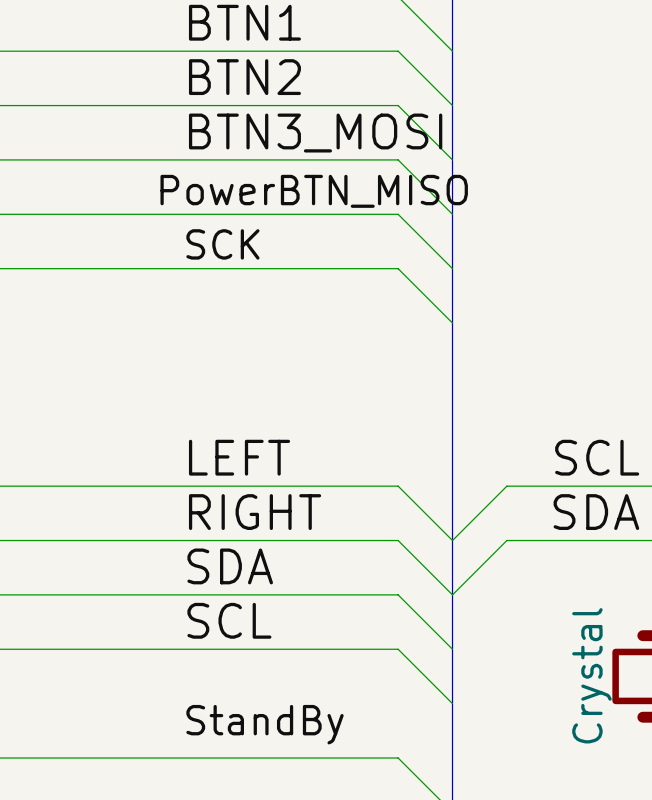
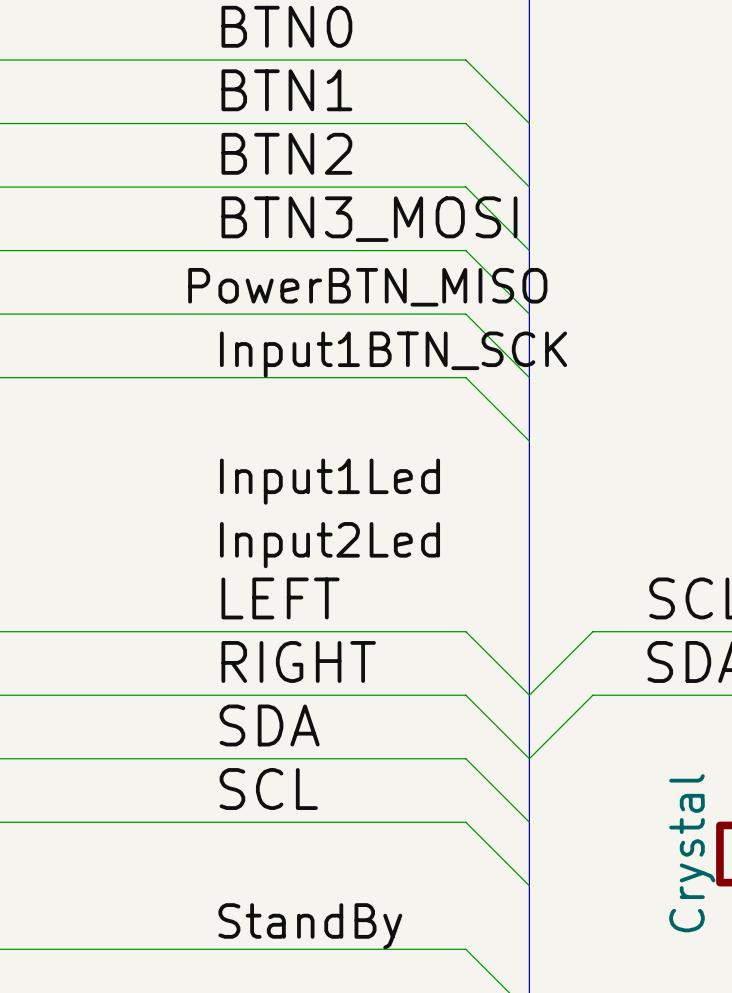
label: SCK (222, 244) -> Input1BTN_SCK (393, 354)
label: none -> Input1Led (329, 481)
label: none -> Input2Led (329, 545)
label position: StandBy (265, 724) -> StandBy (310, 926)

